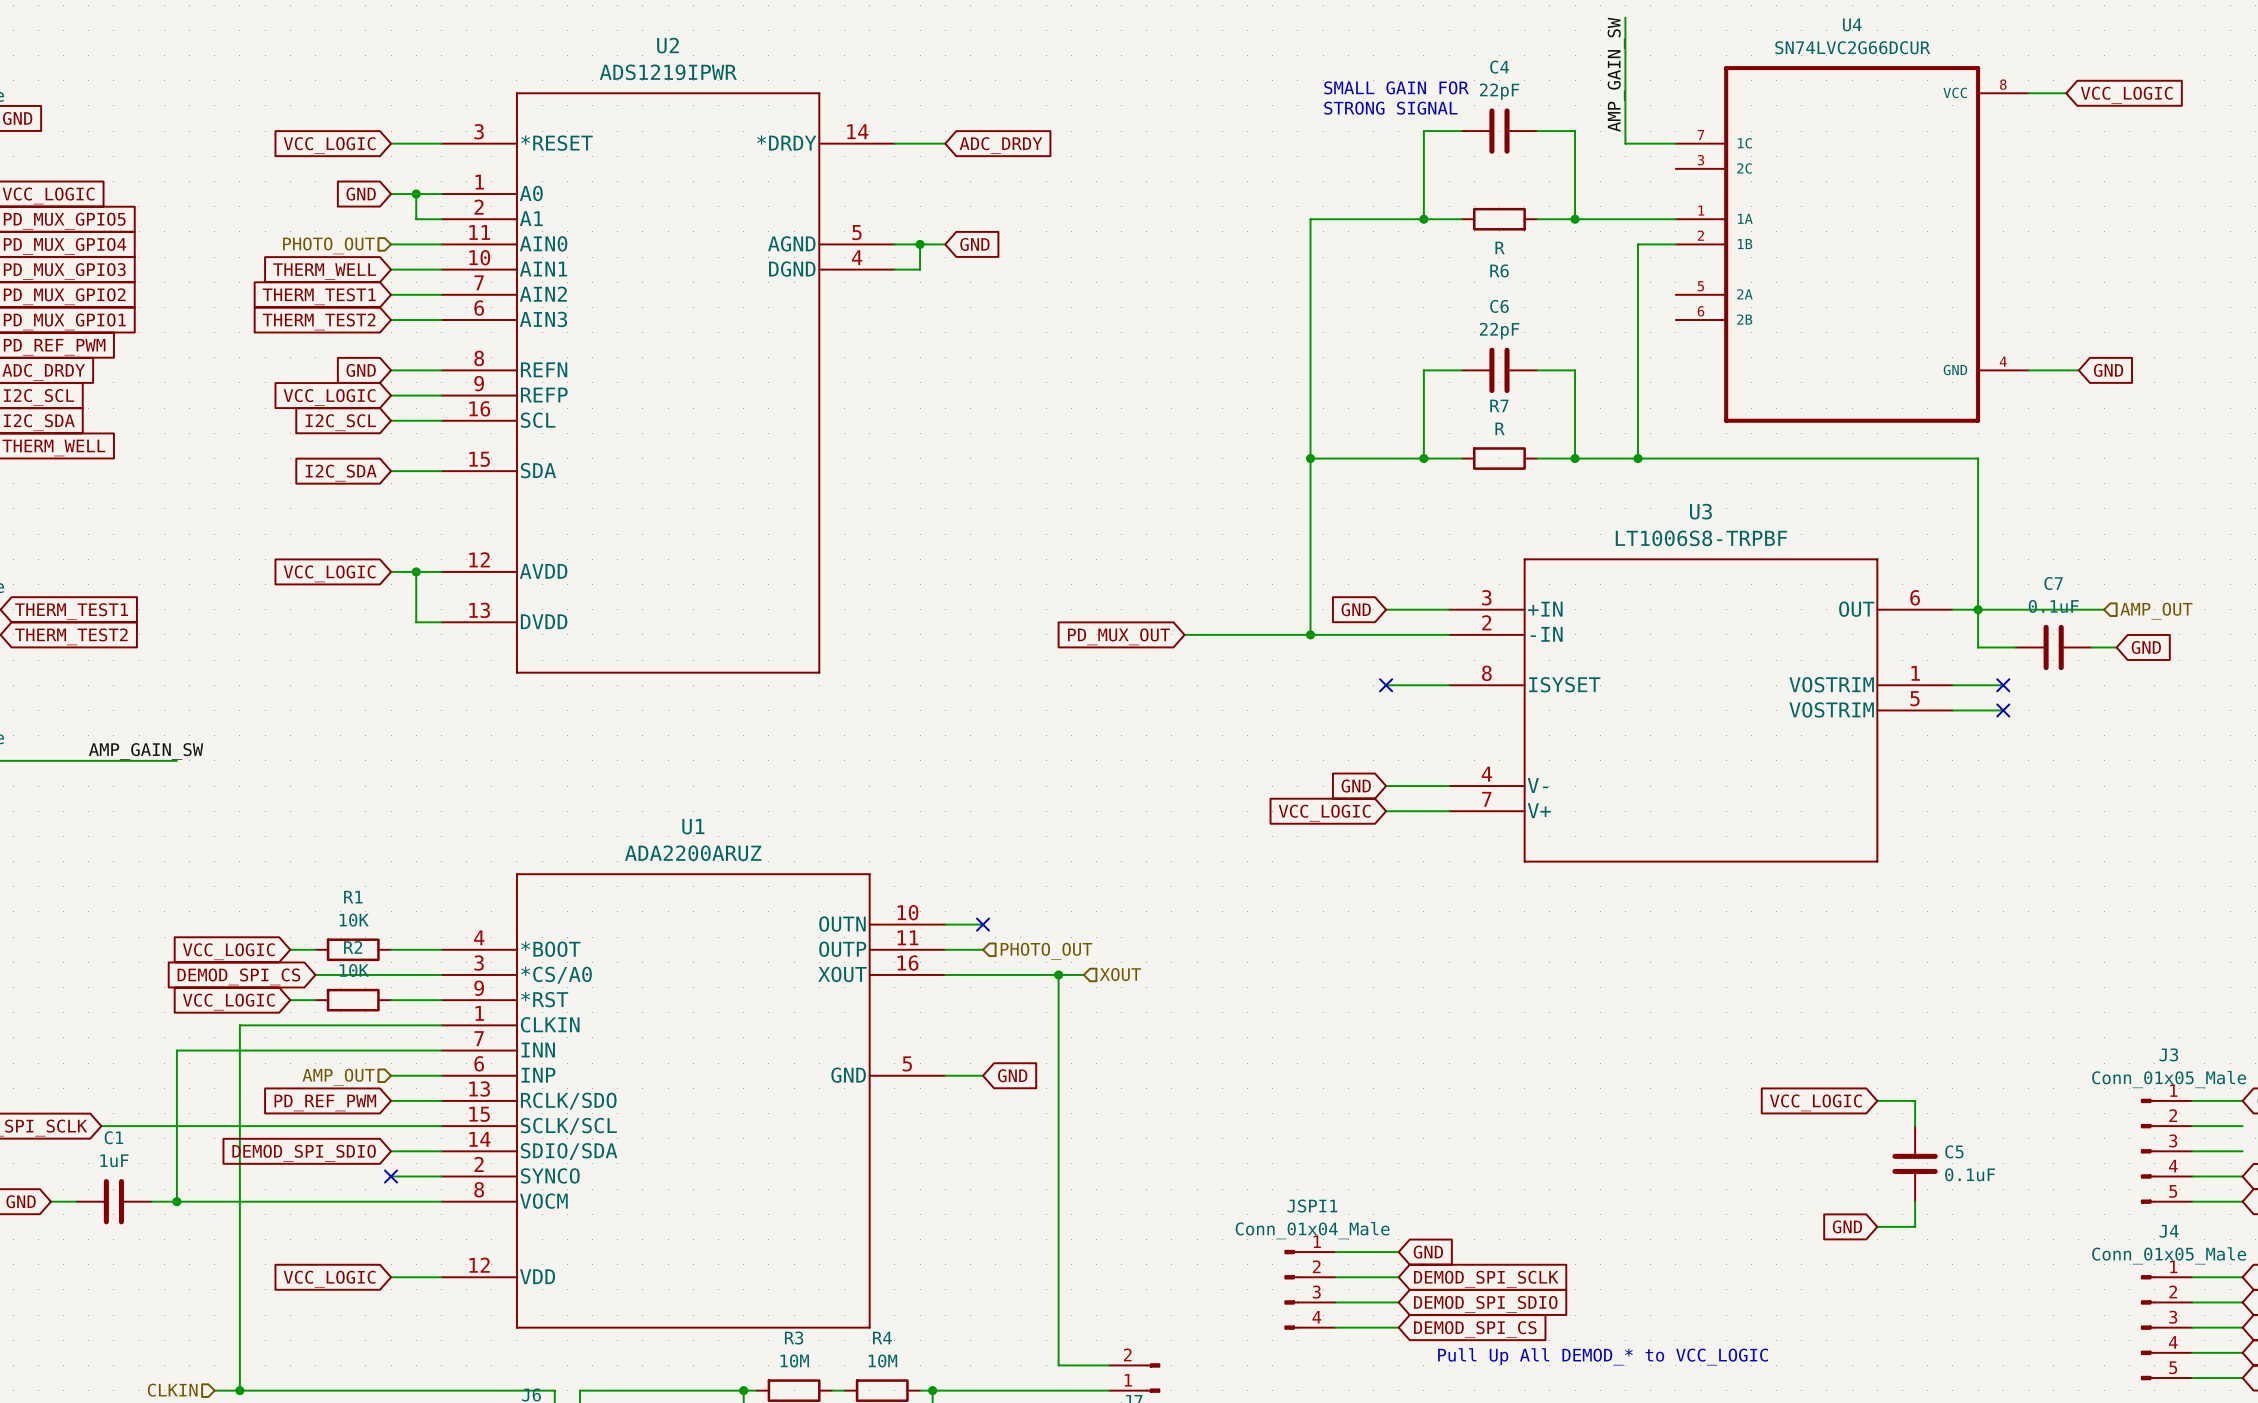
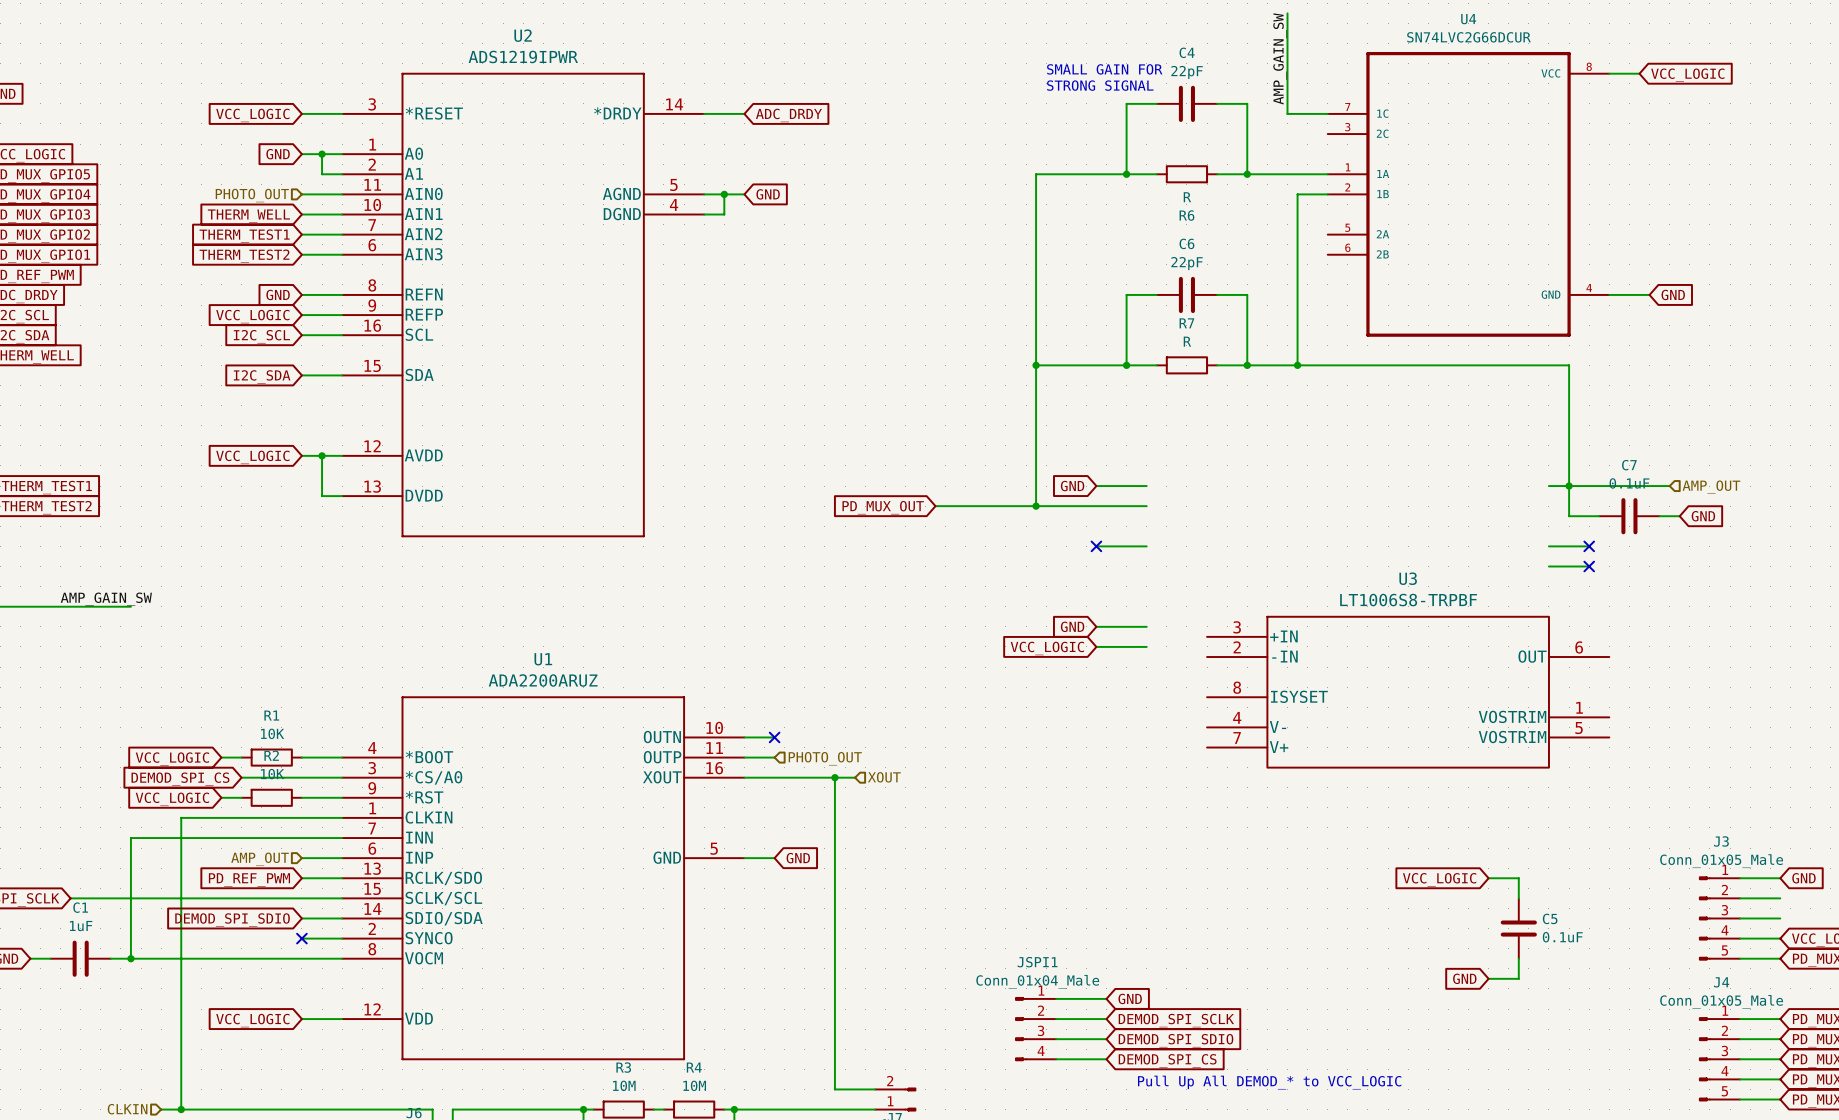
U3 name position: U3 (1700, 511) -> U3 (1408, 578)
U3 value position: LT1006S8-TRPBF (1701, 538) -> LT1006S8-TRPBF (1408, 600)
U3 symbol: [1449, 558, 1953, 863] -> [1207, 616, 1610, 768]

